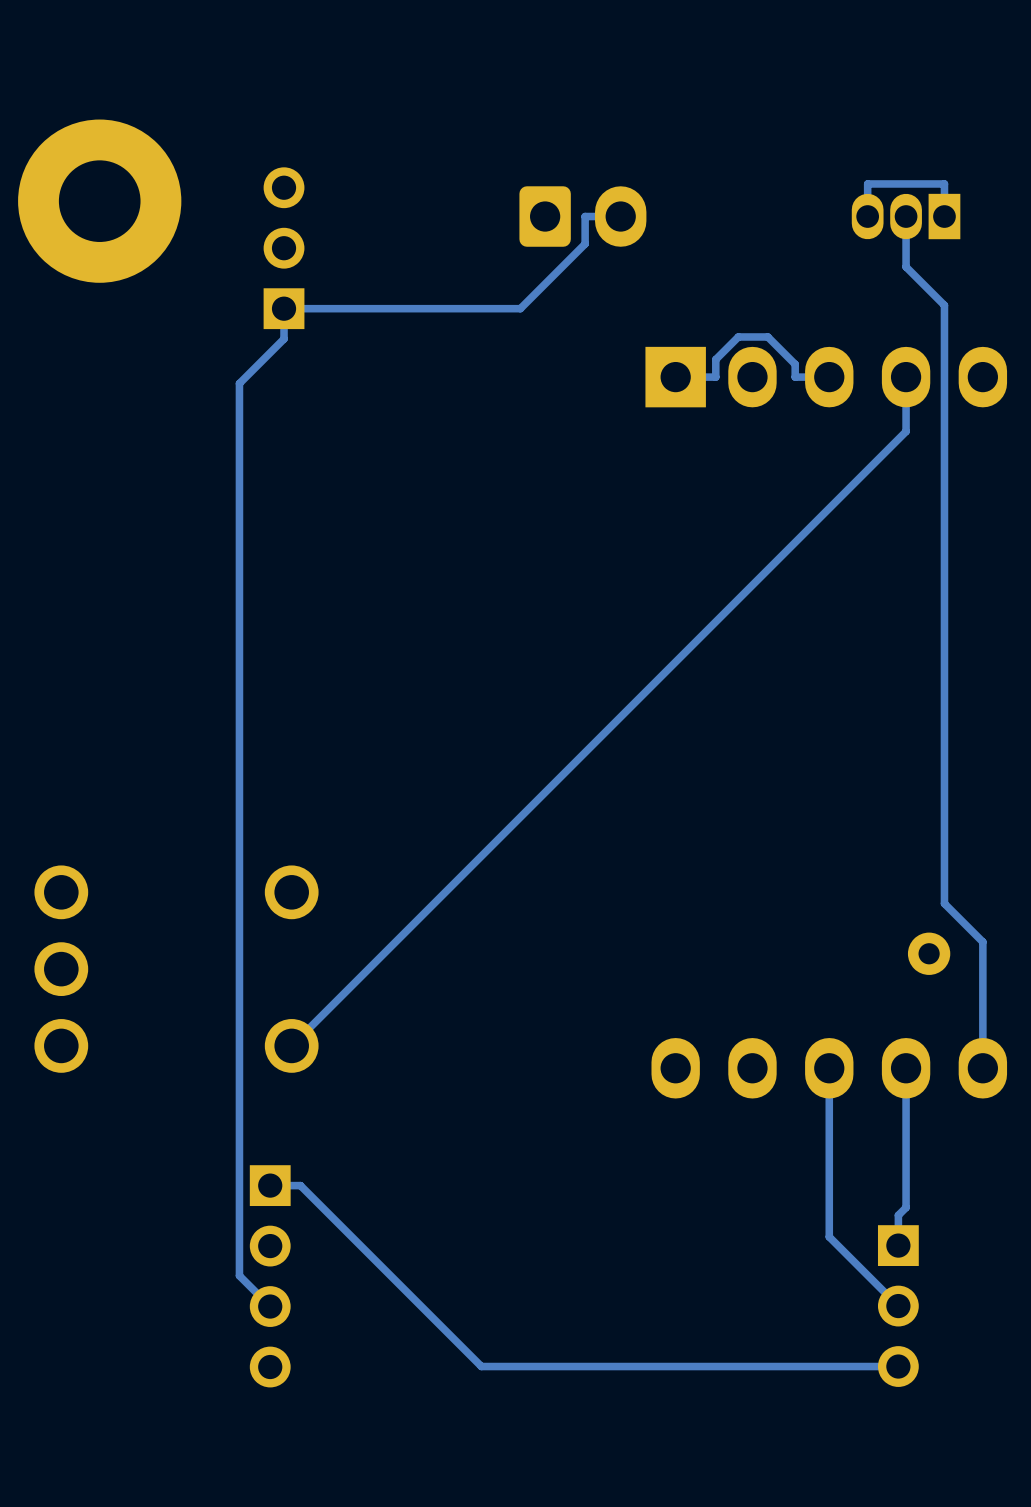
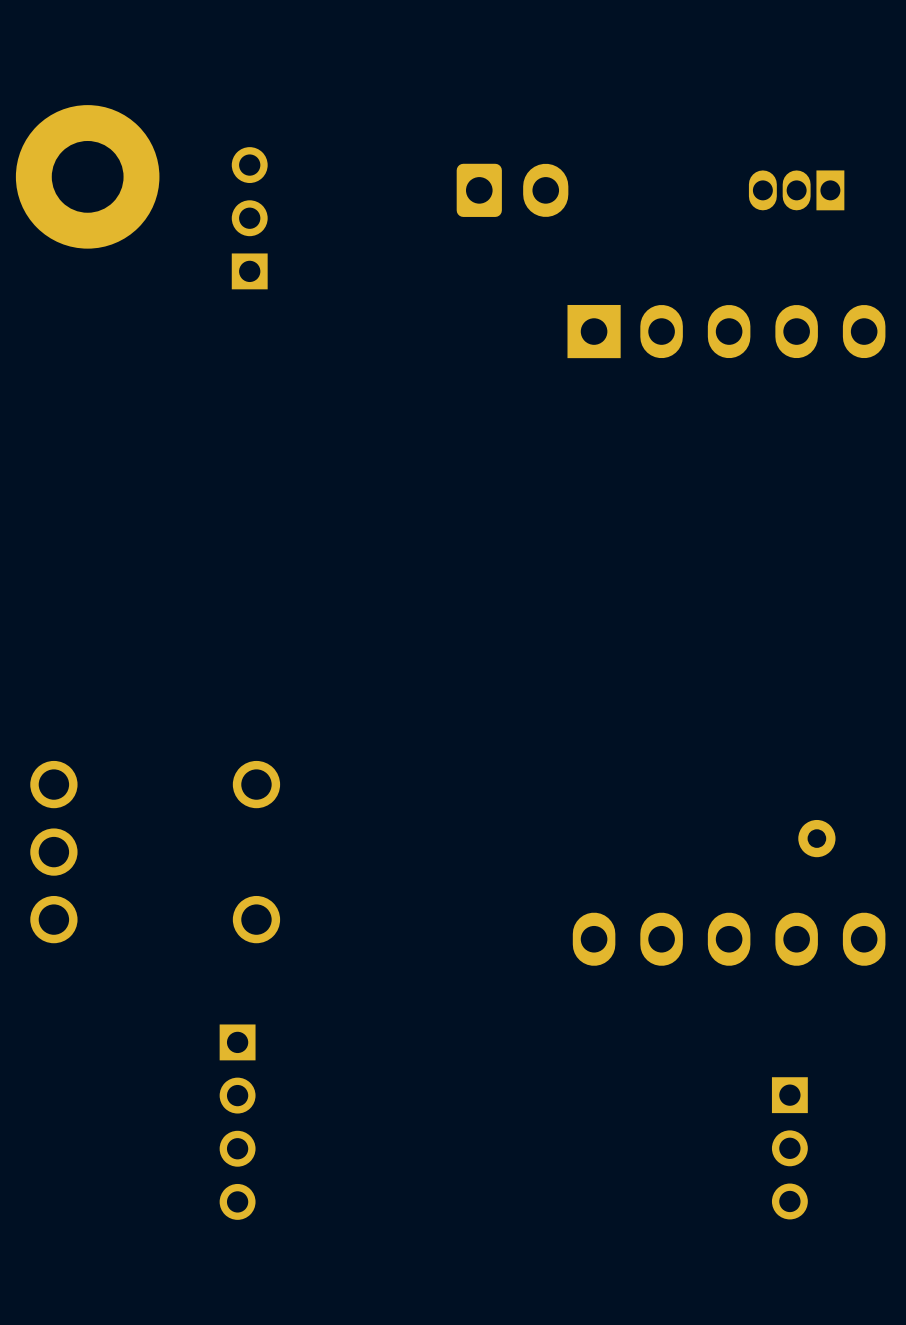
track: (620, 216) (585, 216) (585, 243) (520, 308) (284, 308) (284, 338) (239, 383) (239, 1275) (270, 1306) -> none
track: (906, 216) (906, 266) (944, 305) (944, 903) (982, 942) (982, 1068) -> none
track: (944, 216) (944, 183) (867, 183) (867, 216) -> none
track: (829, 377) (795, 377) (795, 364) (767, 336) (738, 336) (715, 359) (715, 377) (675, 377) -> none
track: (906, 377) (906, 431) (291, 1045) -> none
track: (829, 1068) (829, 1236) (898, 1306) -> none
track: (906, 1068) (906, 1207) (898, 1215) (898, 1245) -> none
track: (270, 1185) (300, 1185) (481, 1366) (898, 1366) -> none

